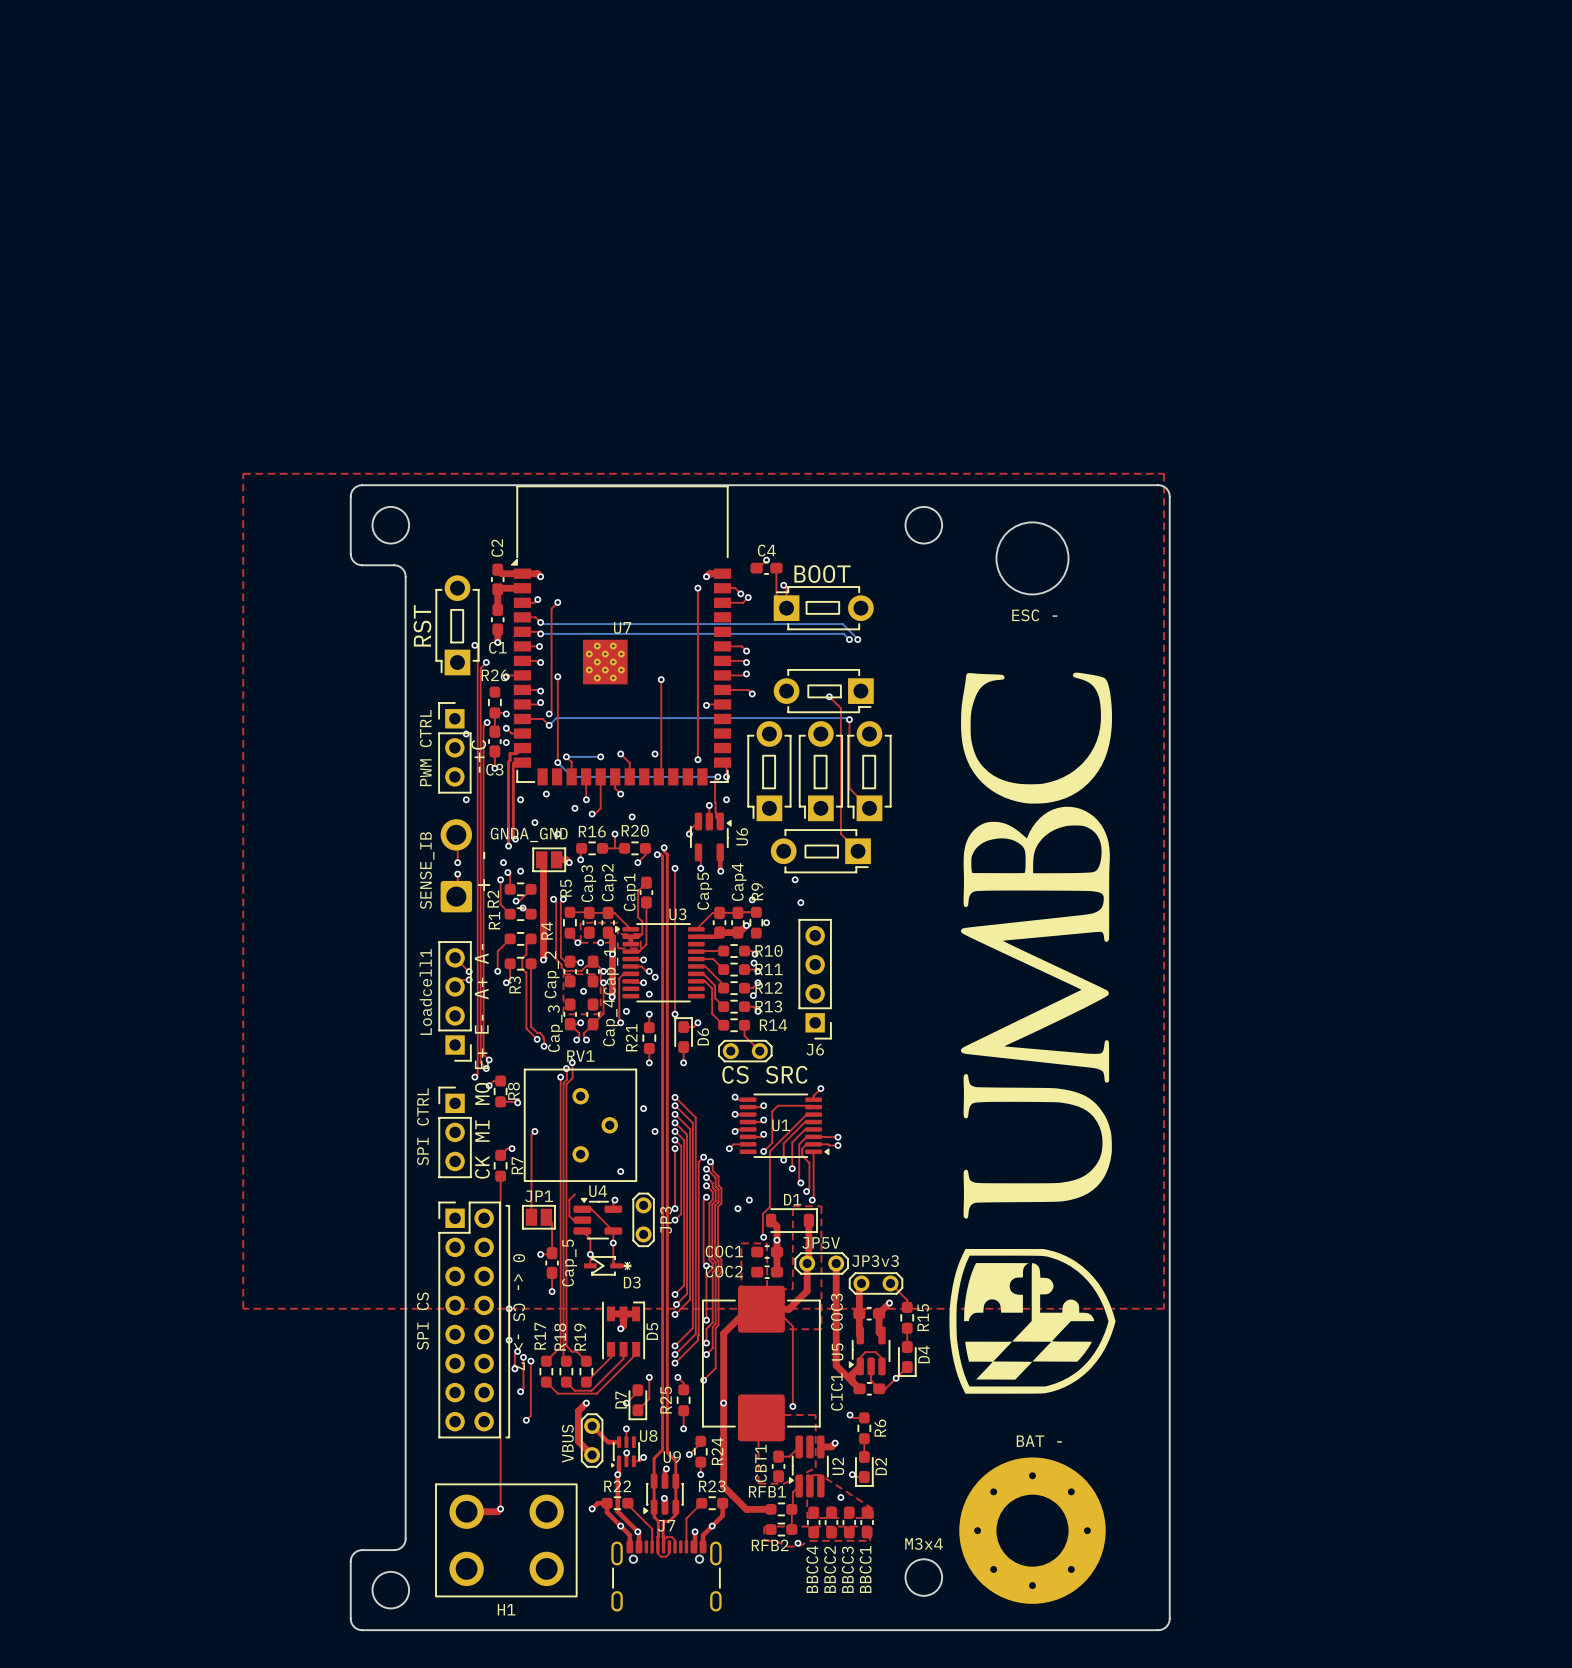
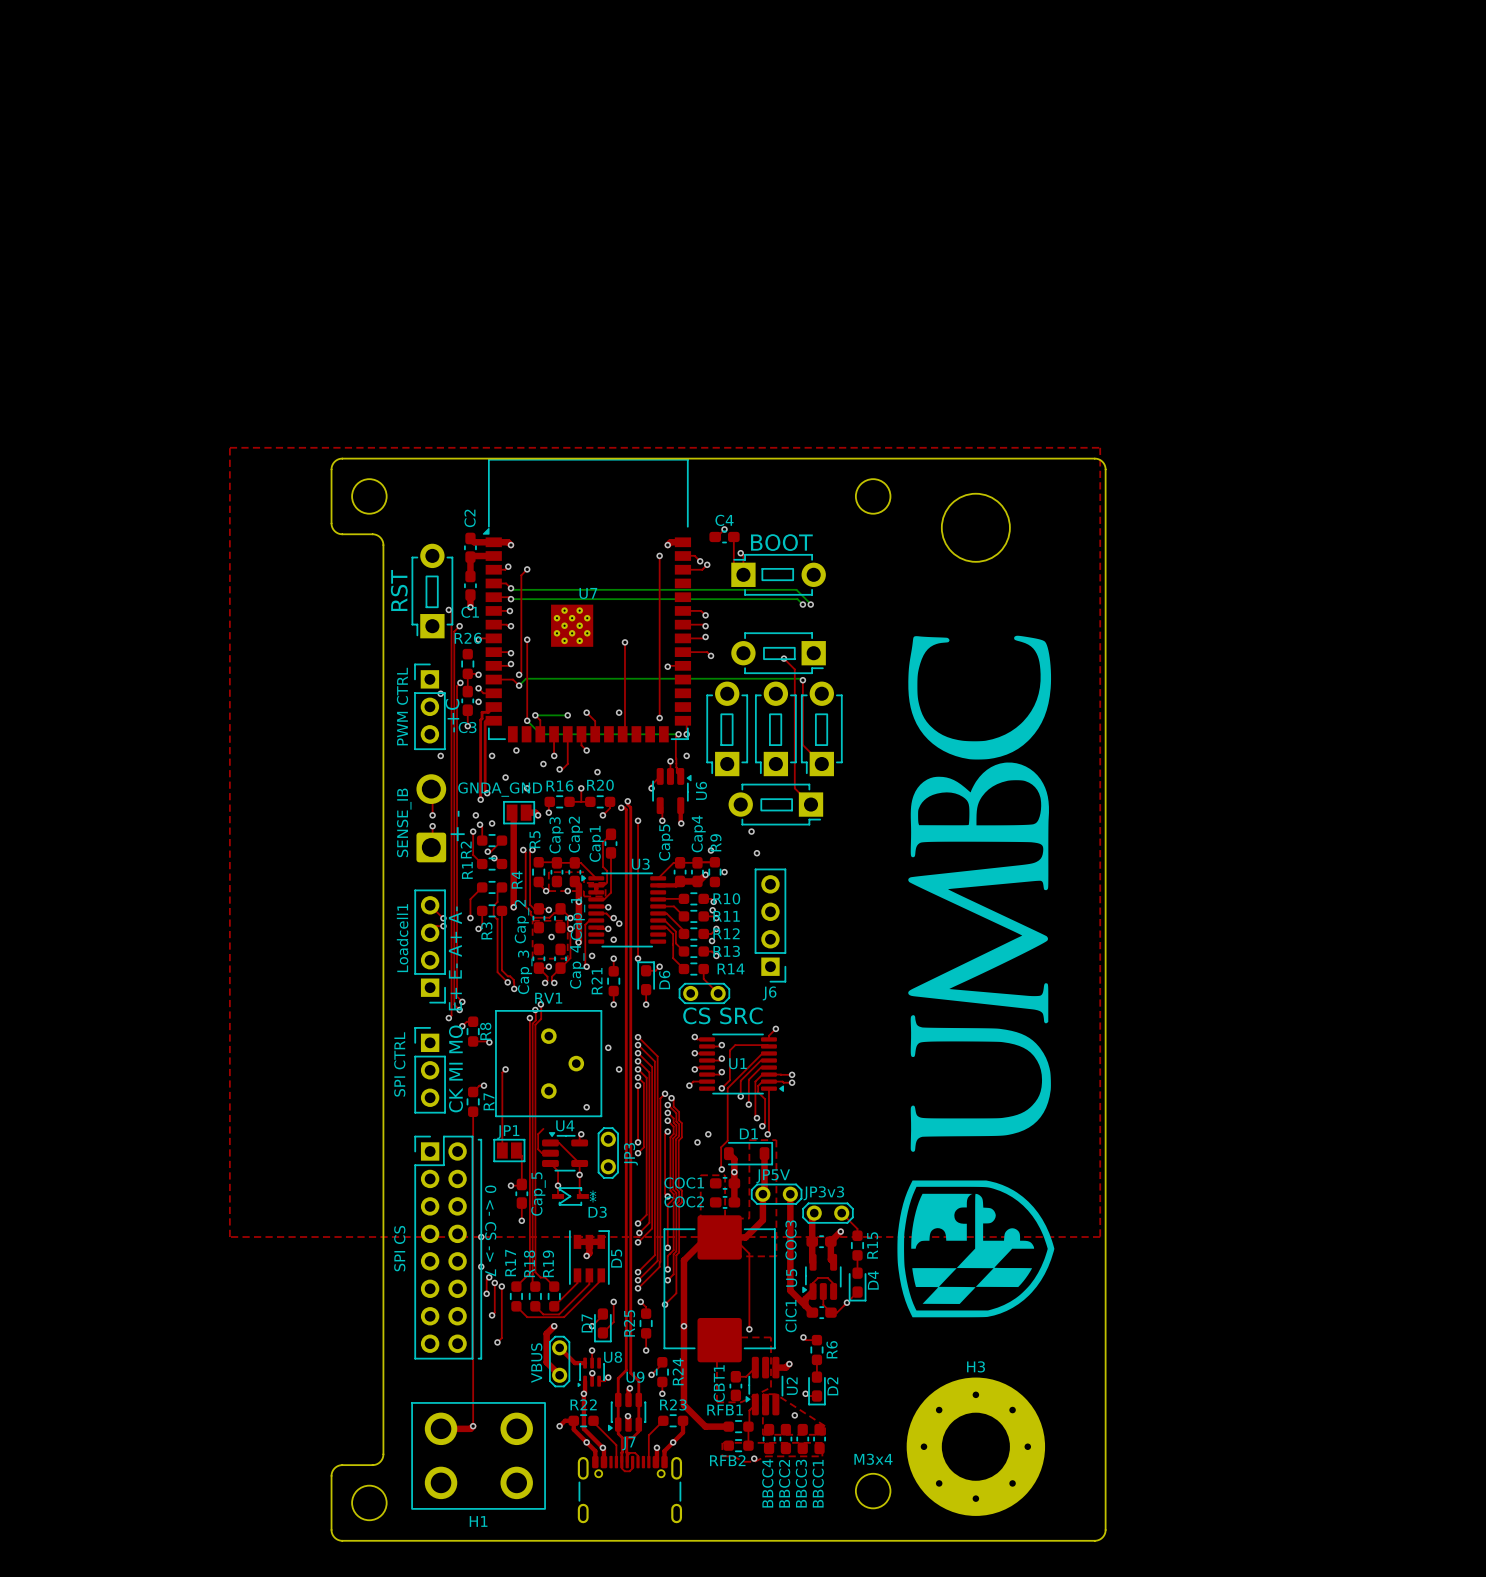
text: ESC - (1034, 615) -> none
text: BAT - (1039, 1441) -> none
H3 name: none -> H3 (976, 1366)

